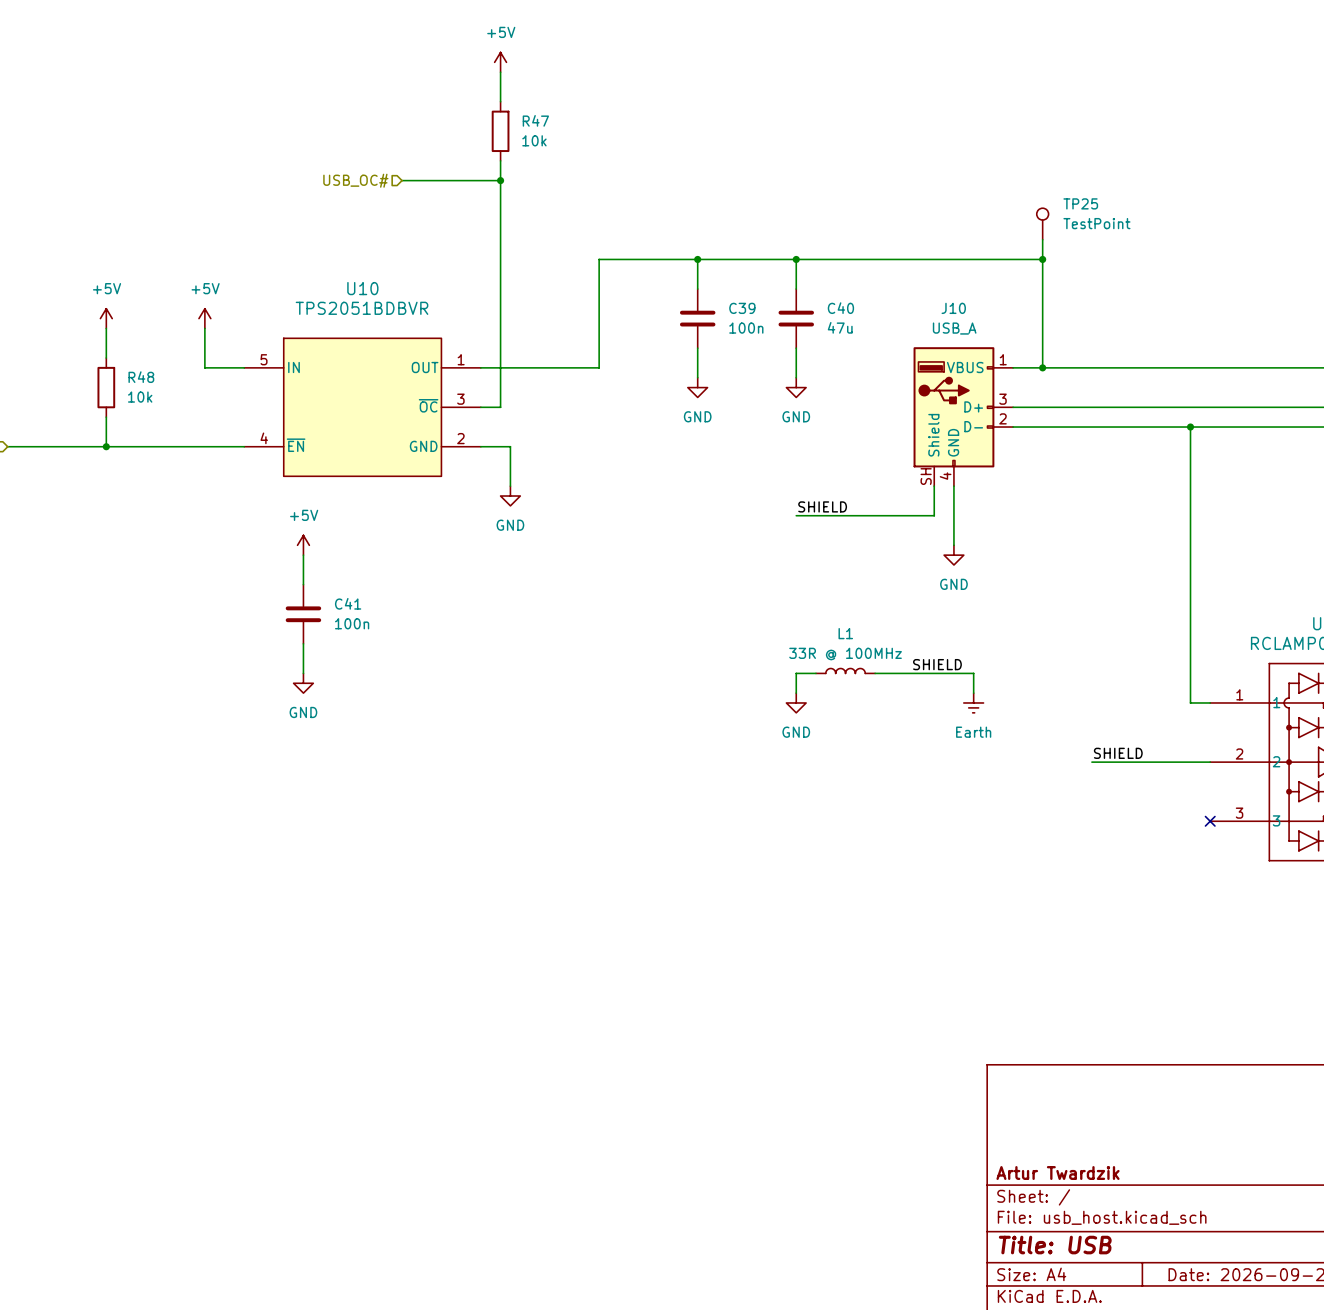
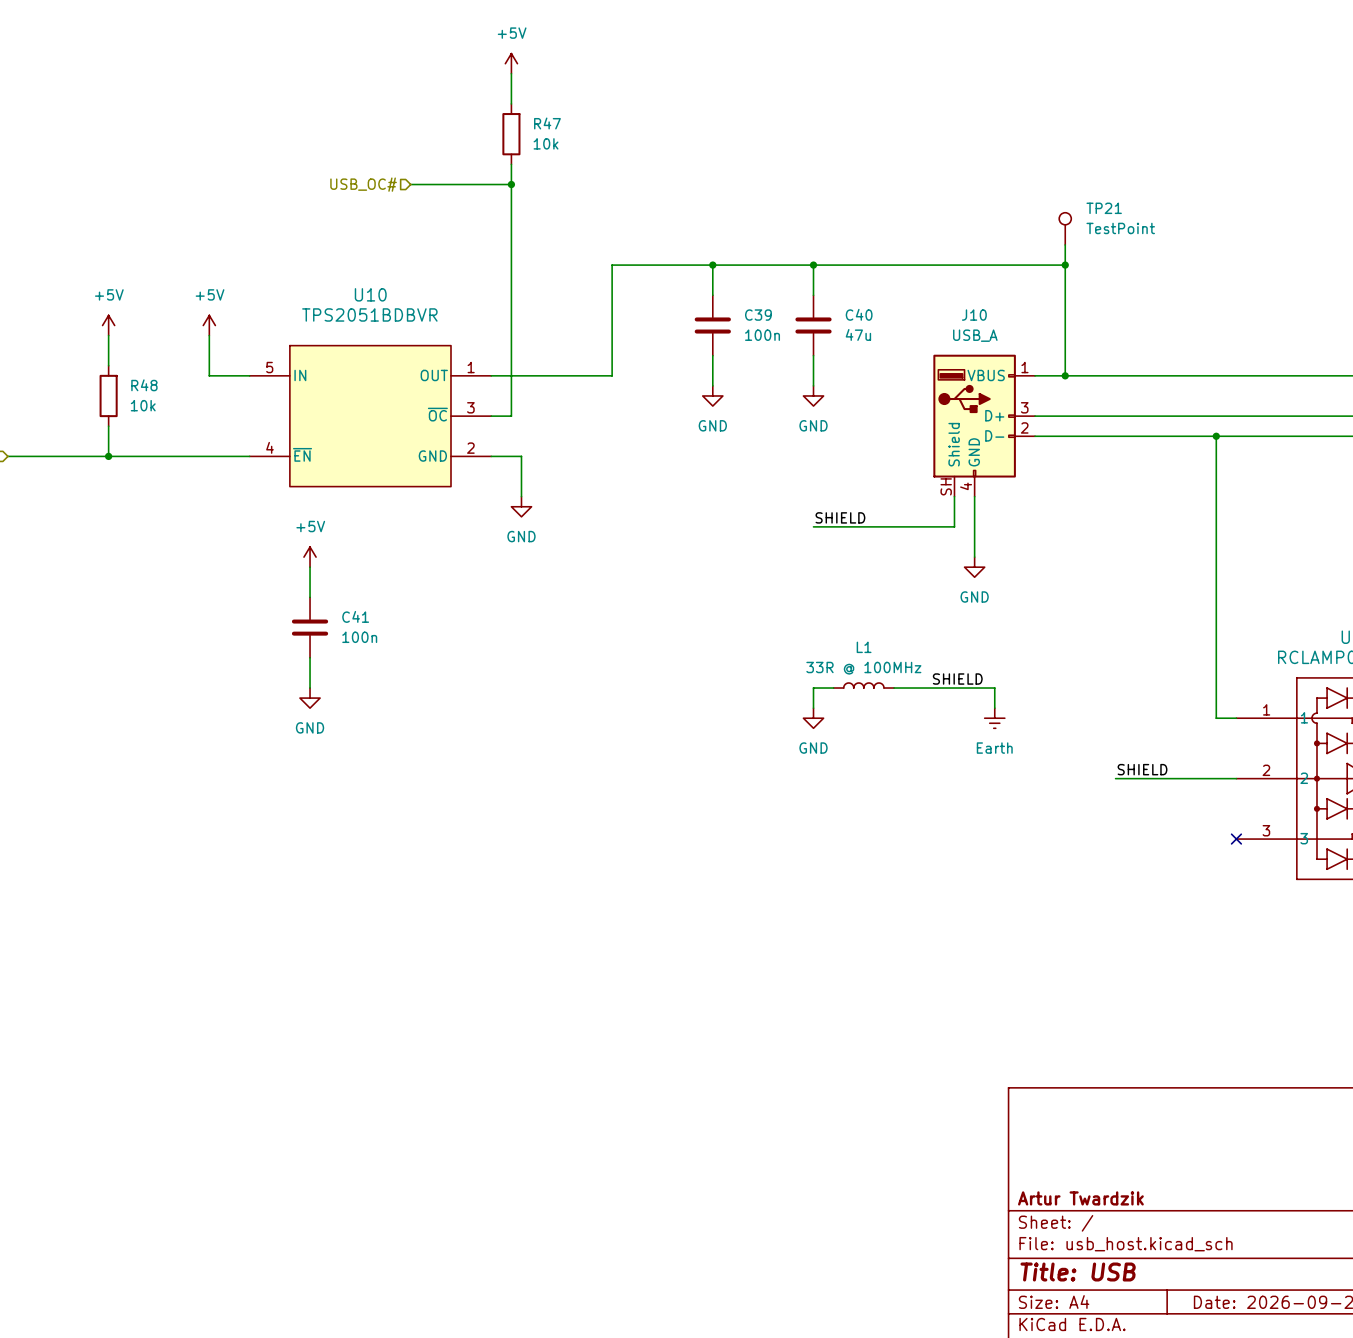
TP25 name: TP25 (1080, 203) -> TP21 (1104, 208)

